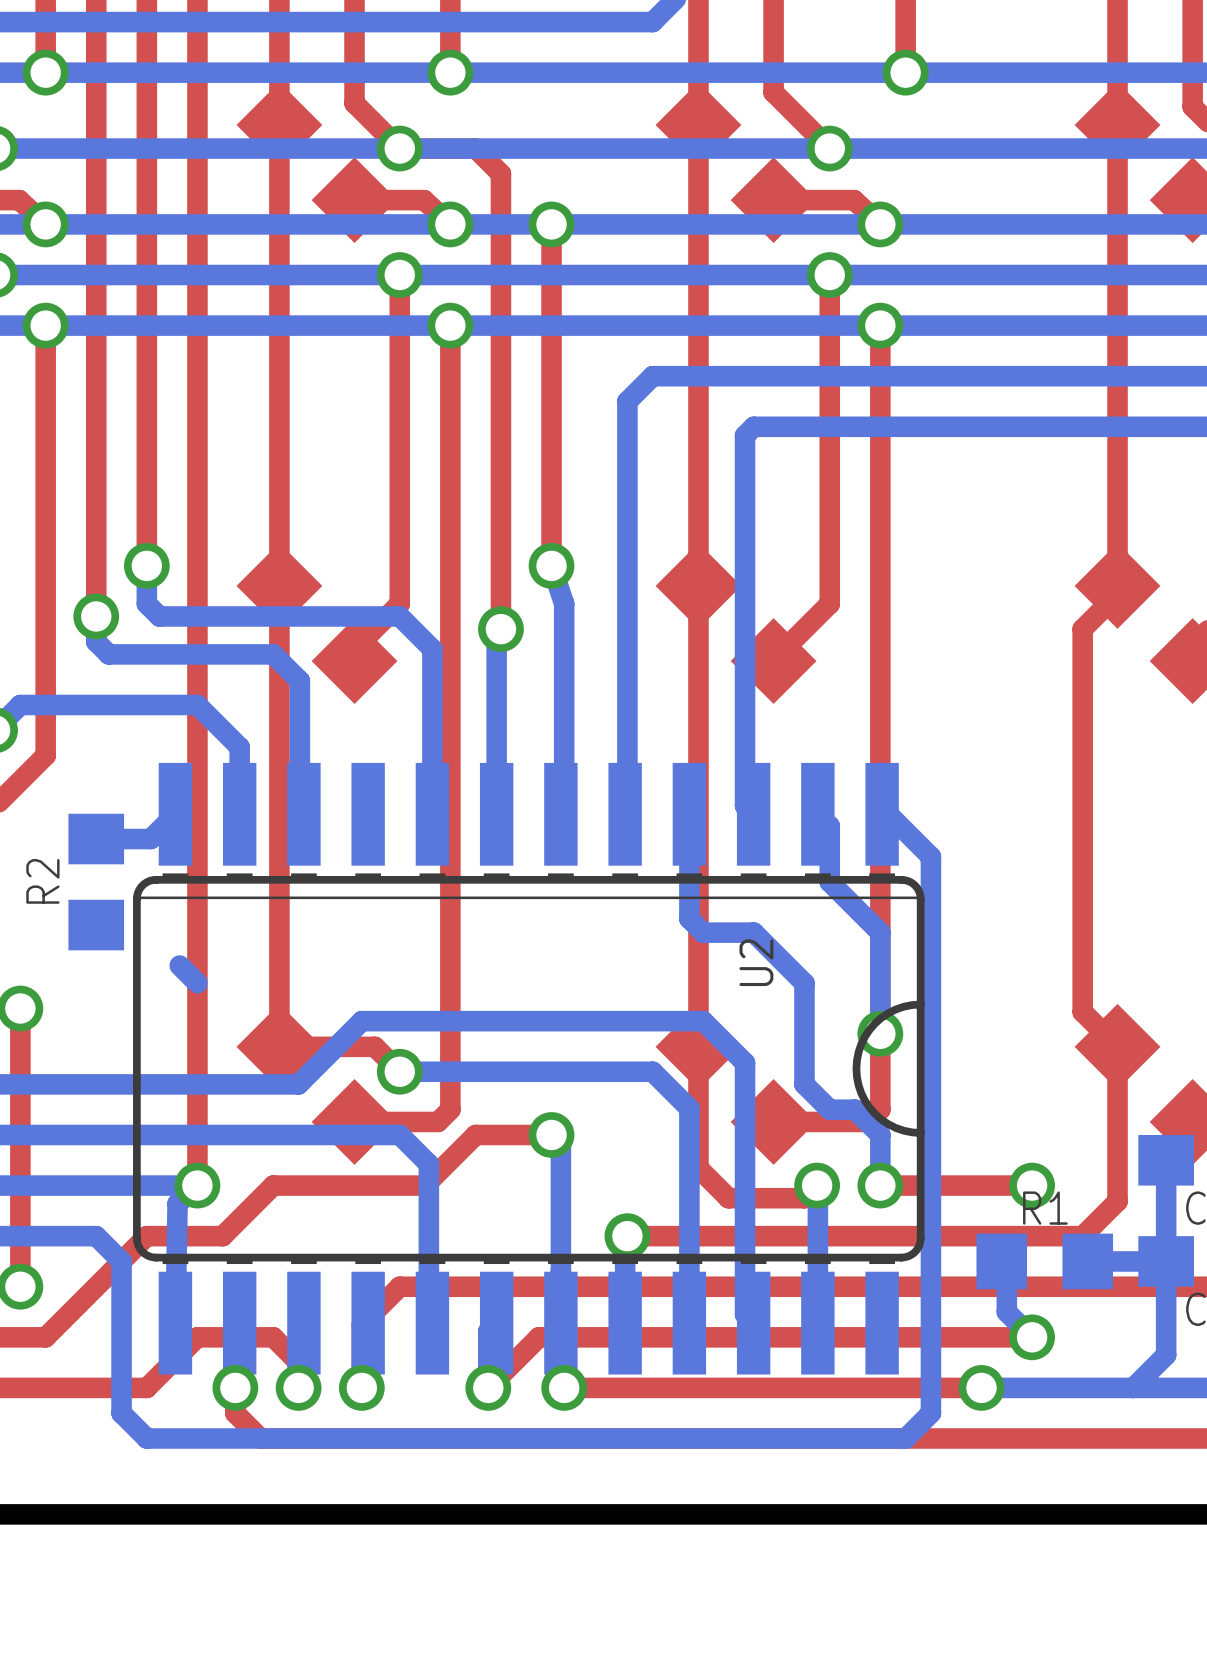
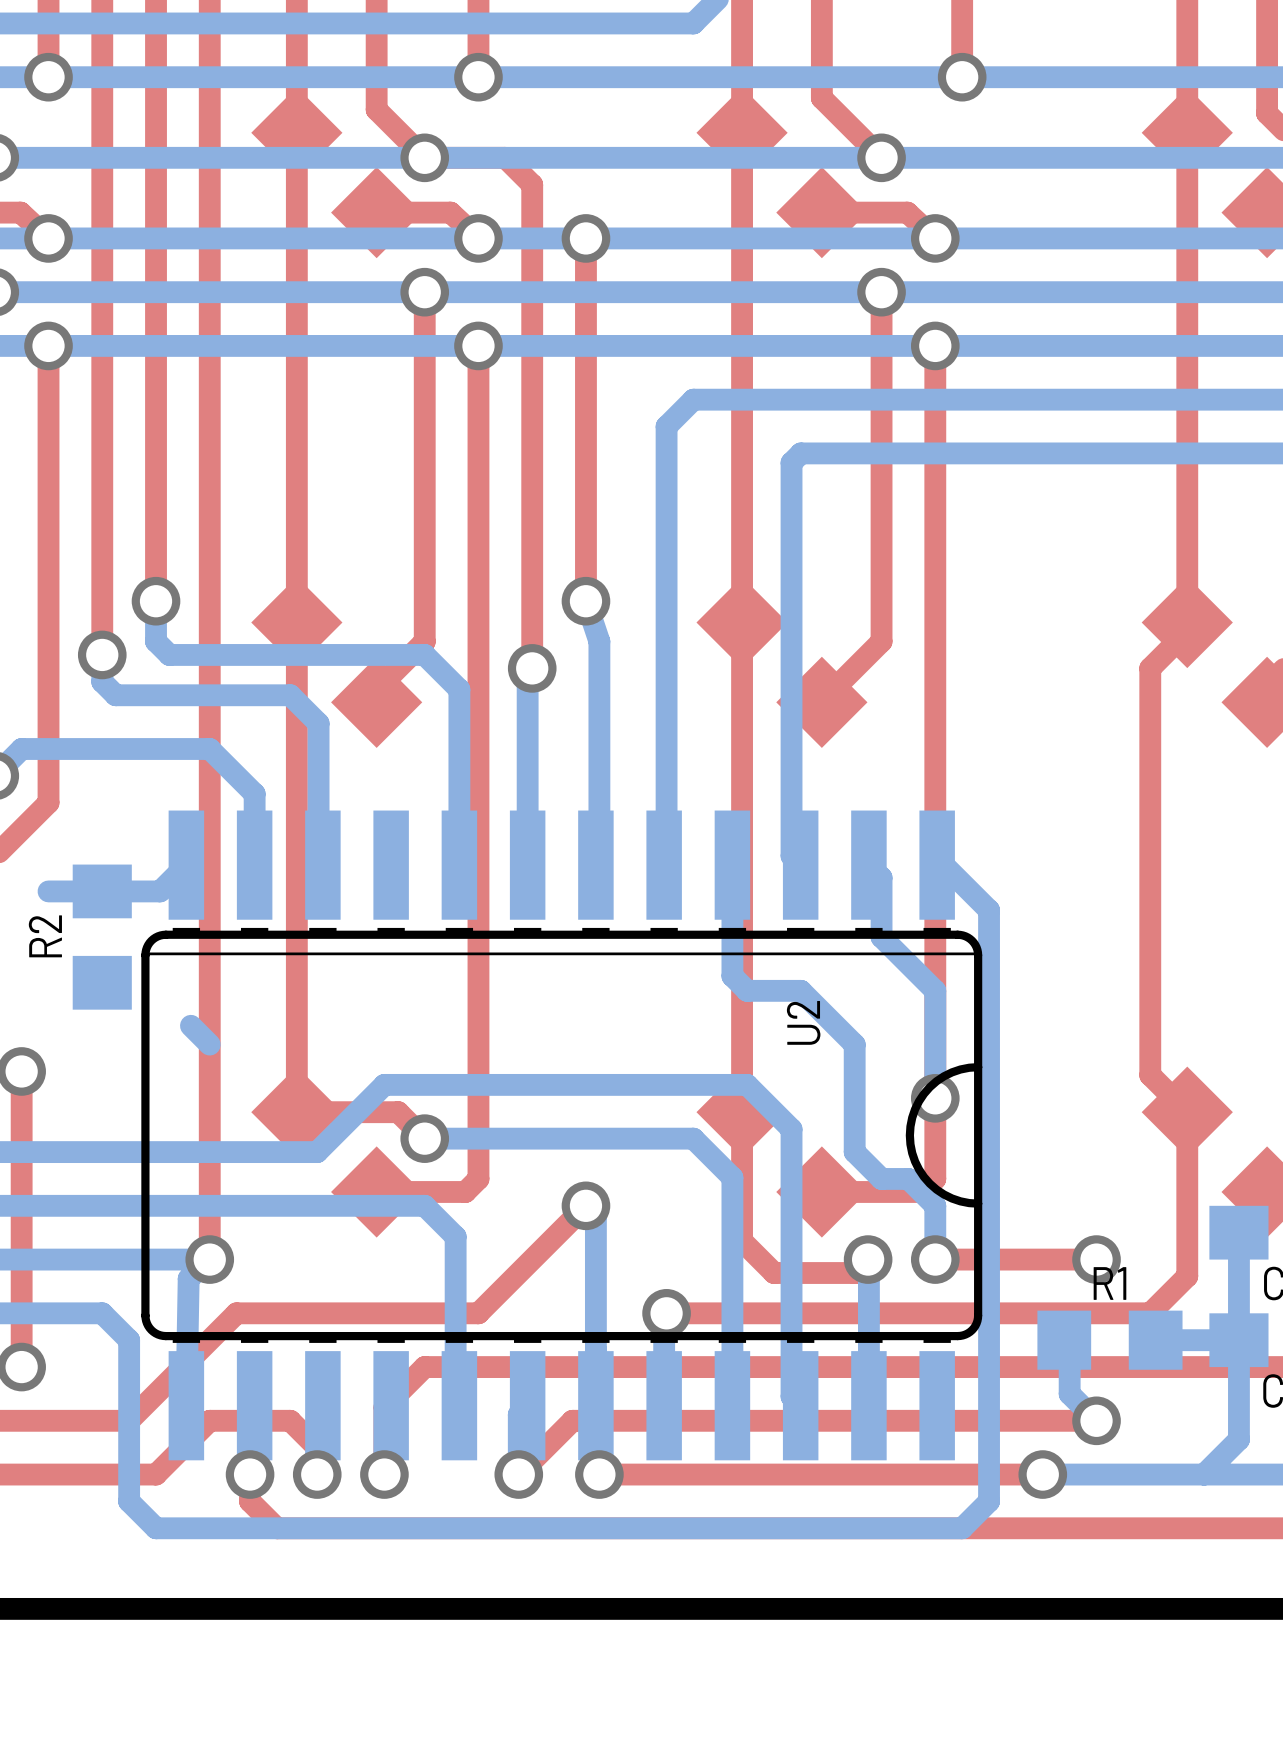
bottom track: none -> (102, 891) (48, 891)
top track: (551, 1134) (475, 1134) (425, 1185) (273, 1185) (222, 1236) (146, 1236) (45, 1337) -> (585, 1205) (478, 1313) (236, 1313) (129, 1420) (48, 1420)

